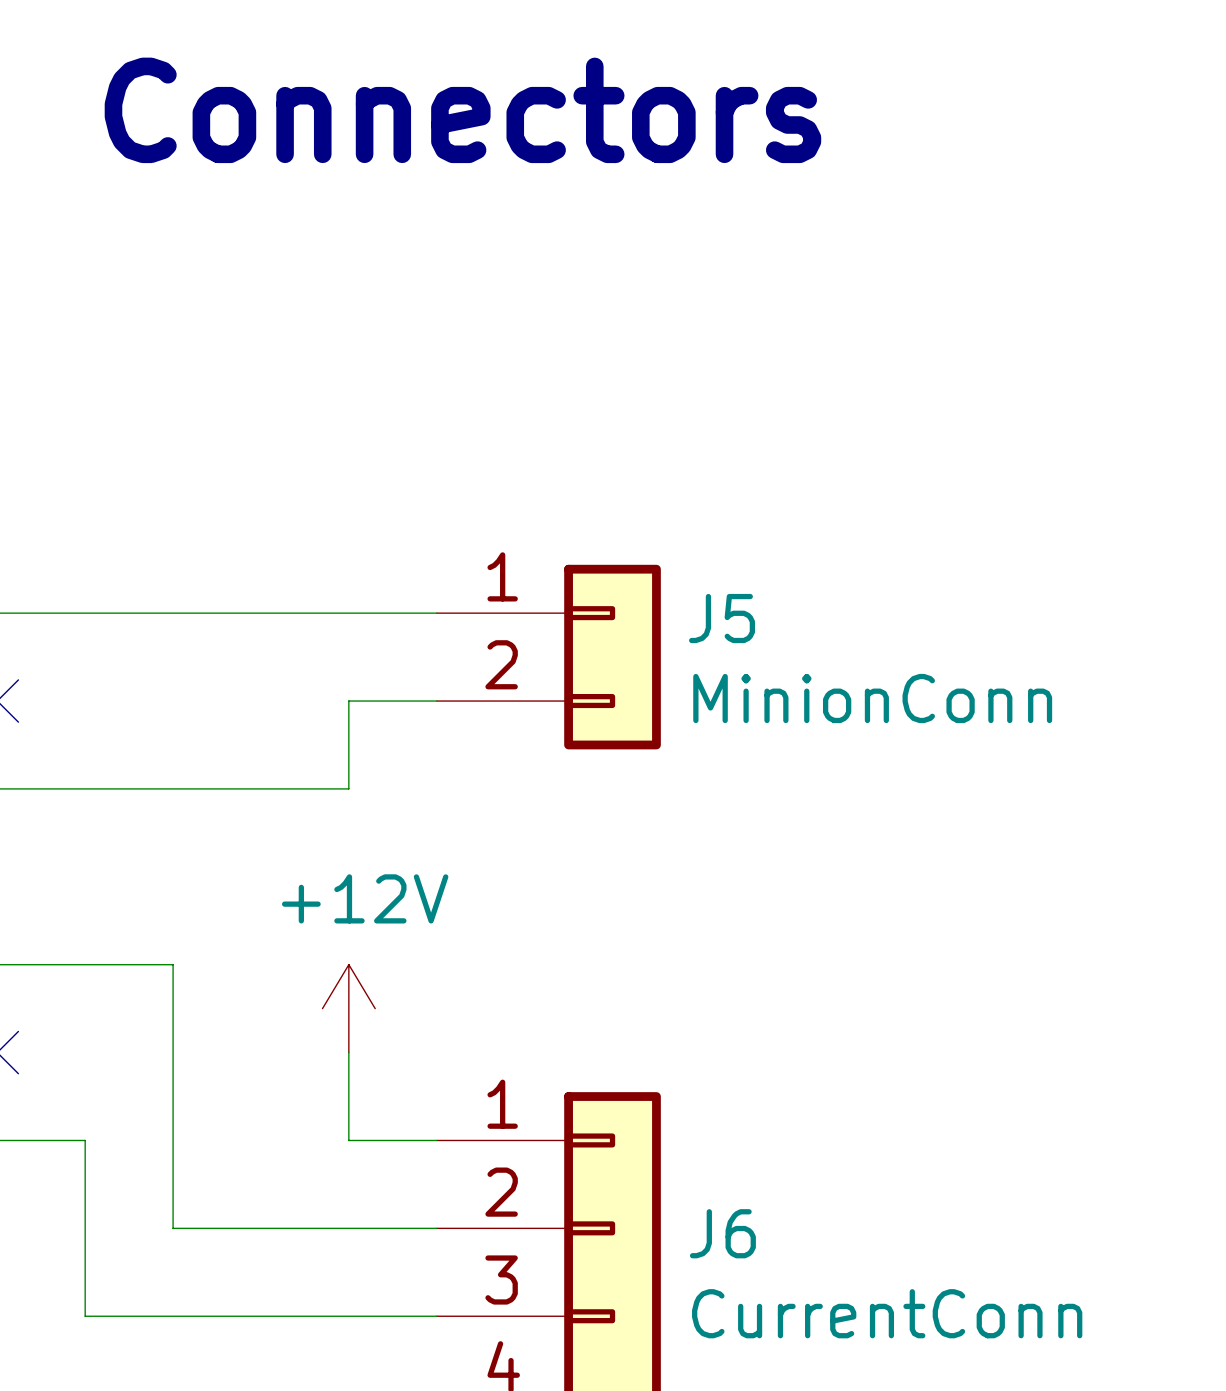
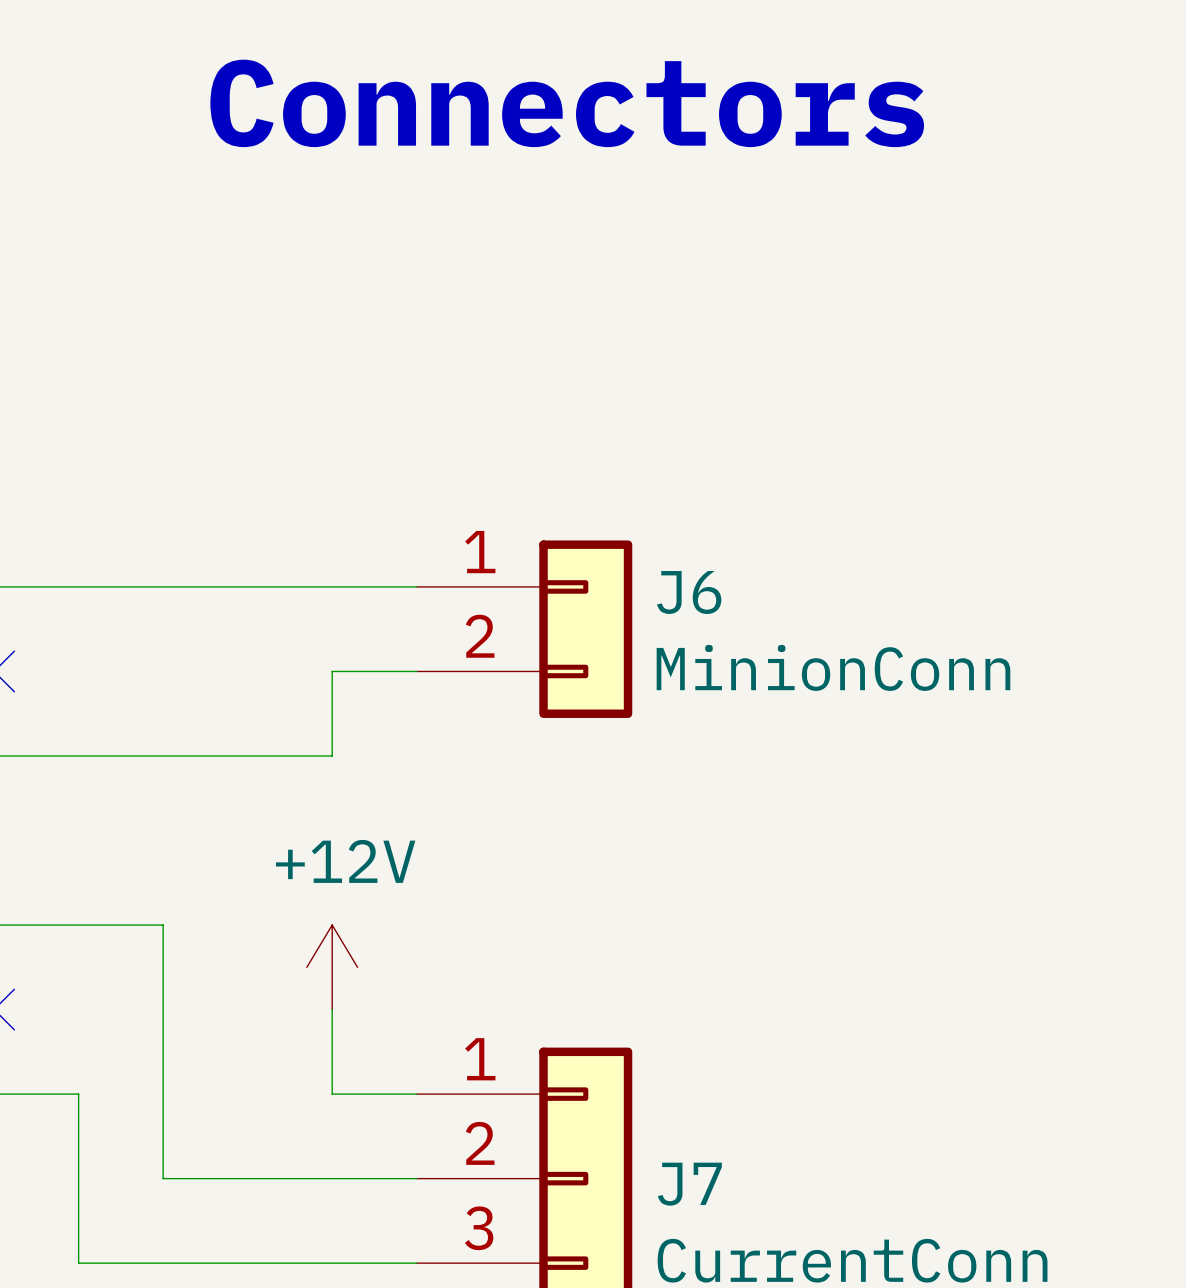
text position: Connectors (462, 110) -> Connectors (567, 103)
J5 name: J5 (722, 618) -> J6 (689, 592)
J6 name: J6 (722, 1233) -> J7 (689, 1184)

